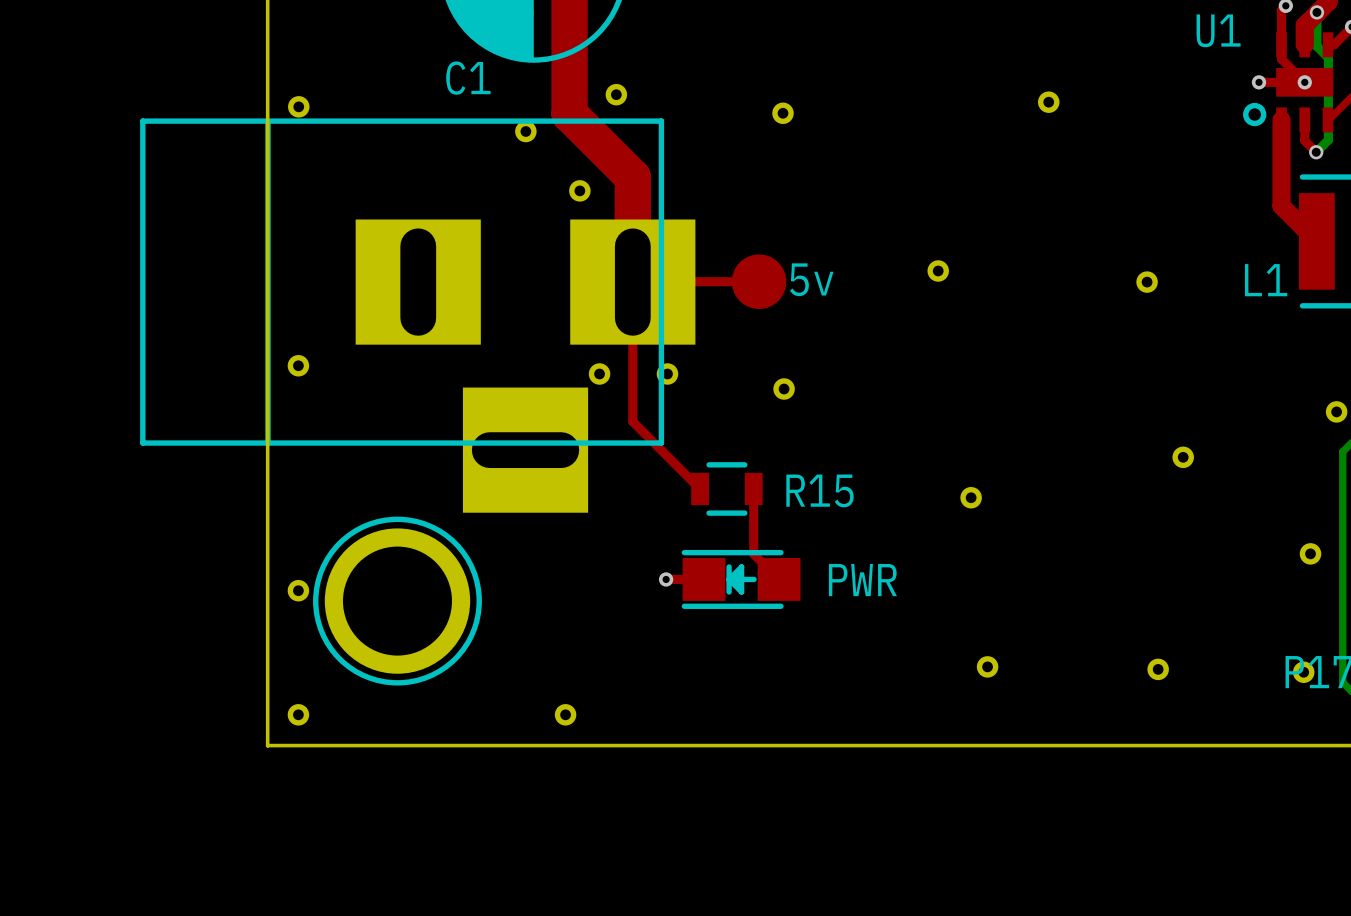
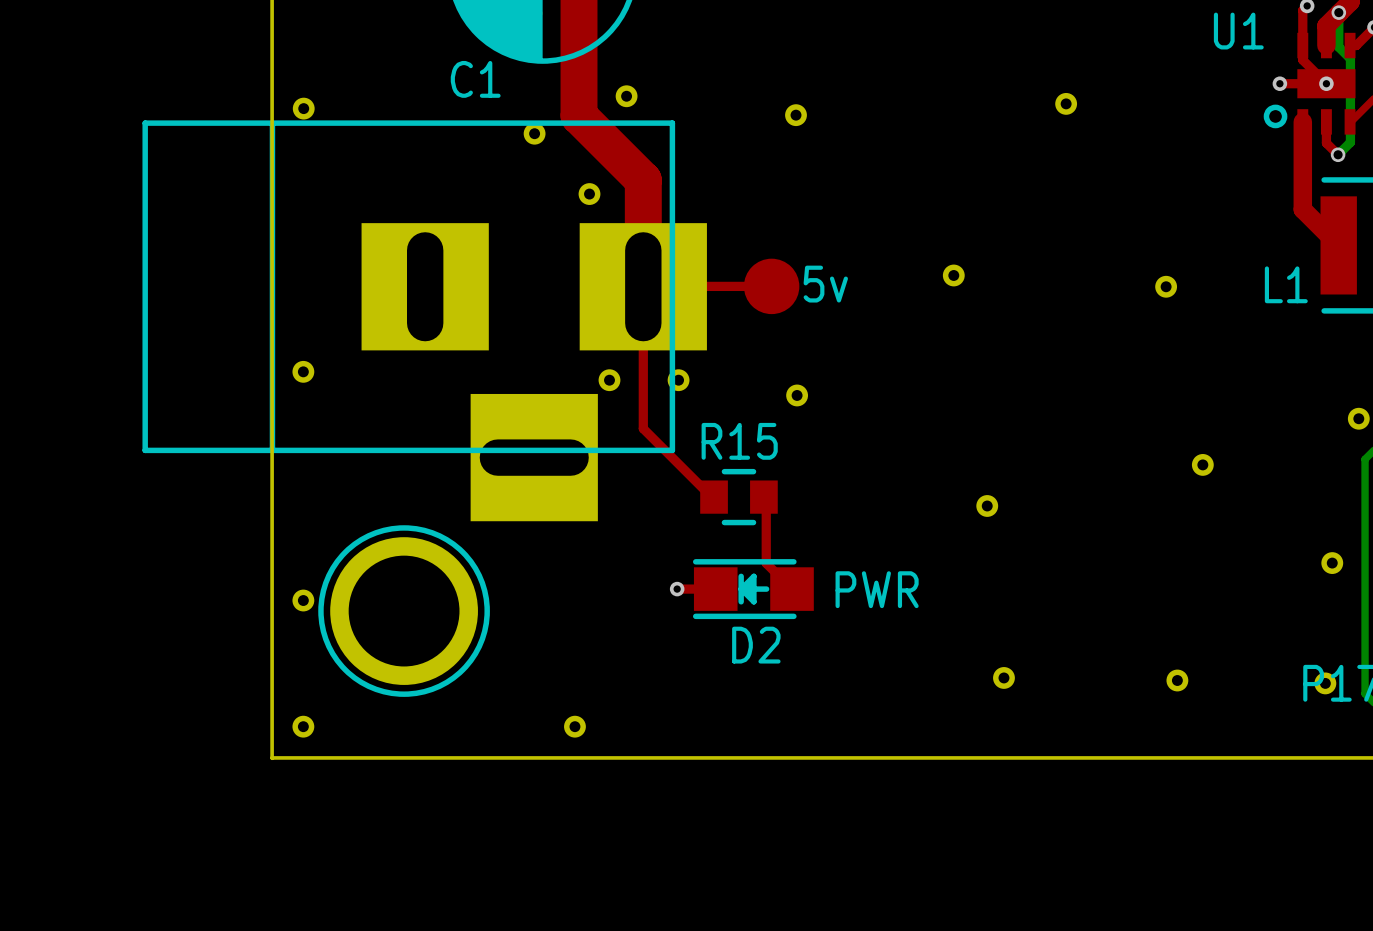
R15 footprint: [691, 462, 763, 516] -> [700, 468, 778, 526]
R15 name position: R15 (820, 490) -> R15 (739, 441)
D2 name: none -> D2 (756, 645)

